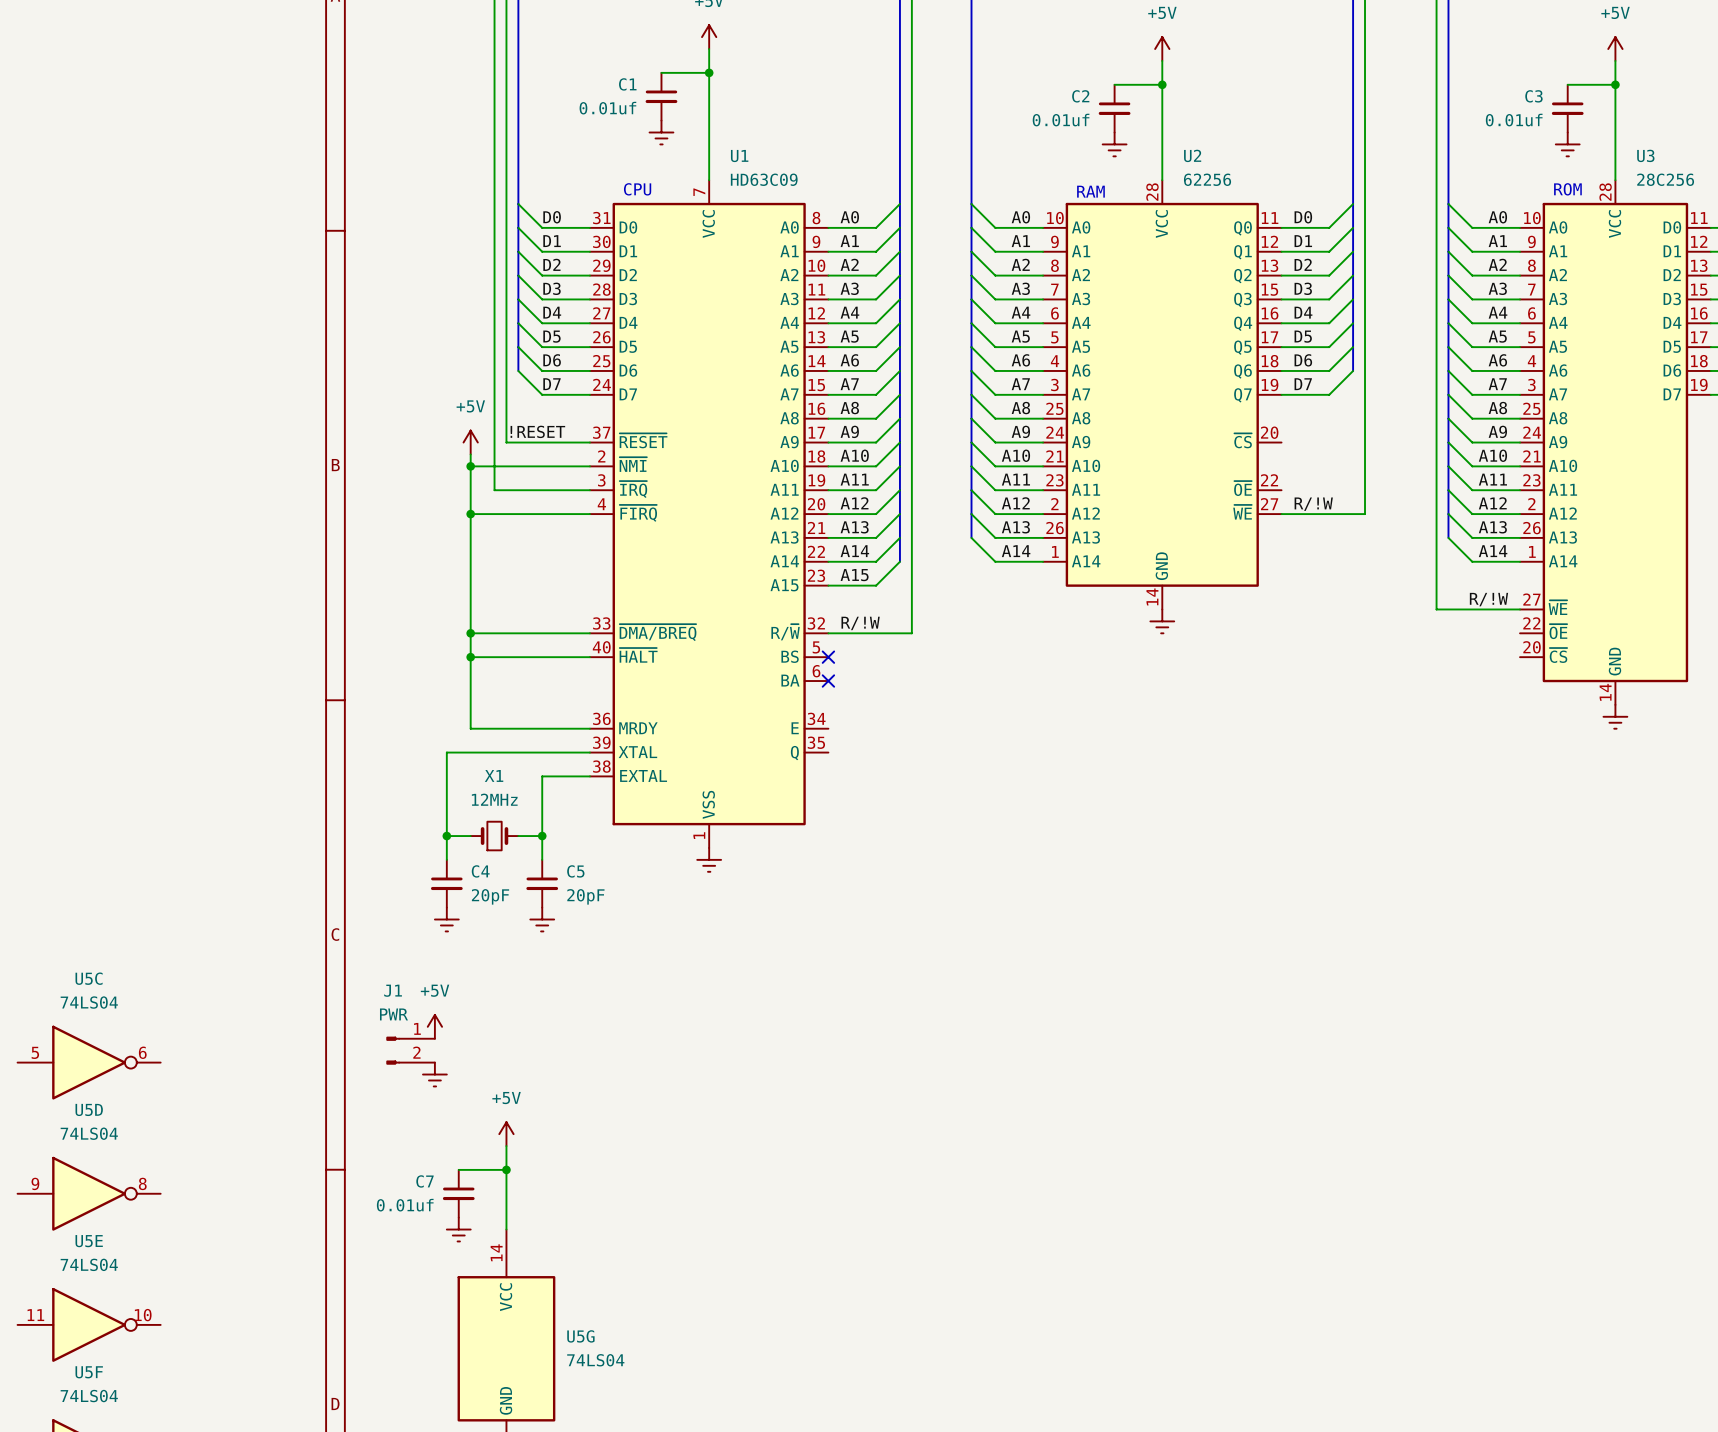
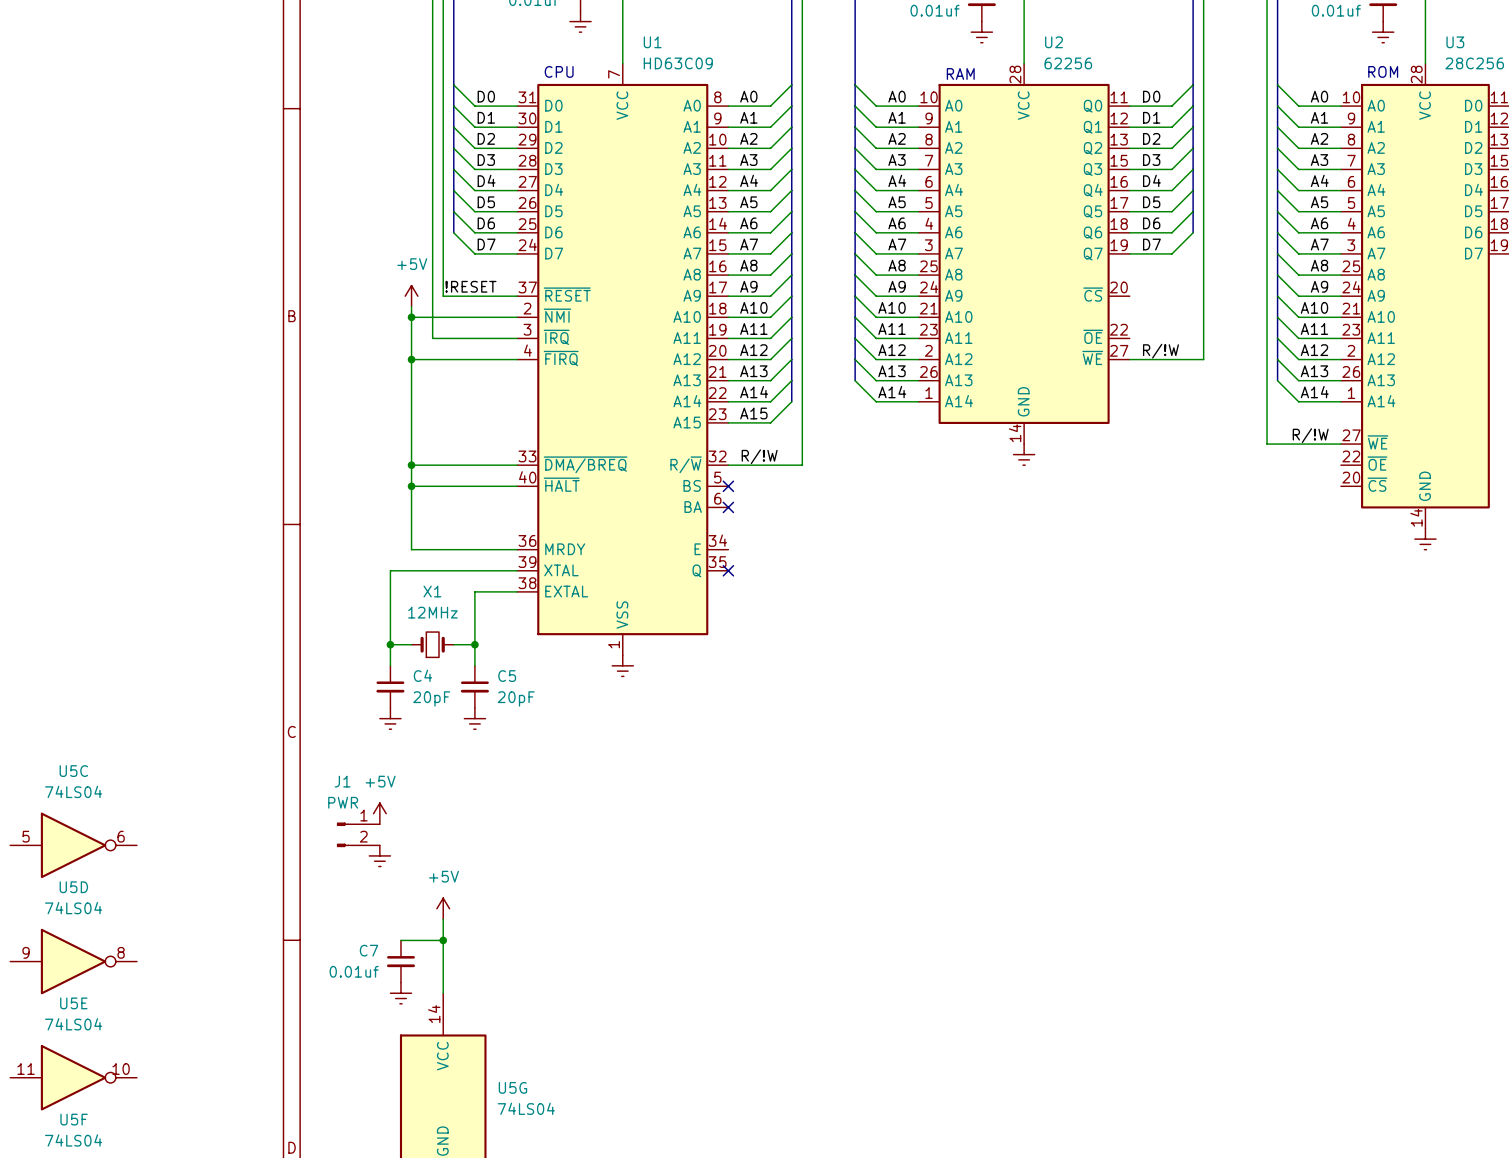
no-connect mark: none -> (728, 570)

